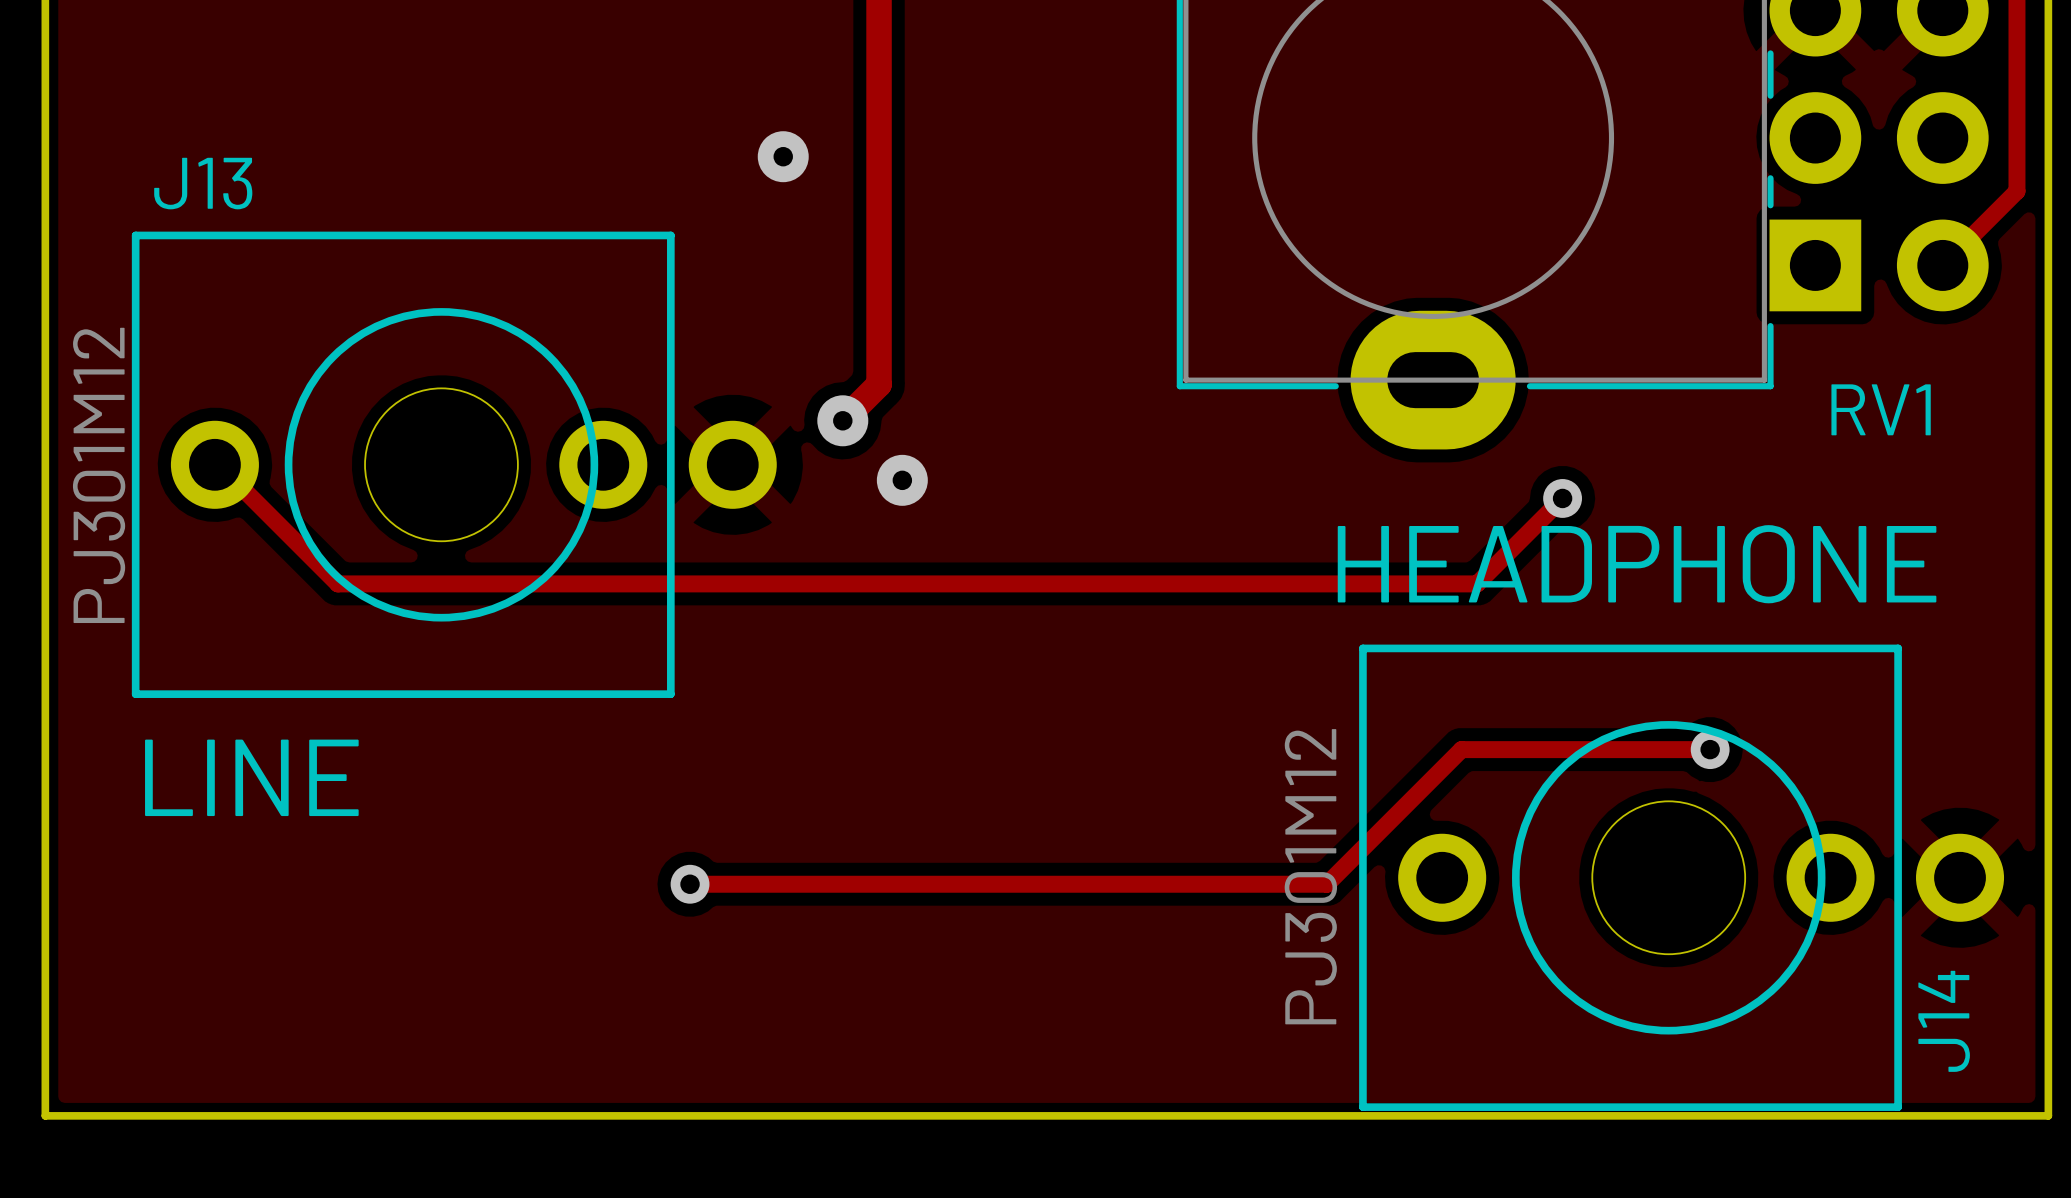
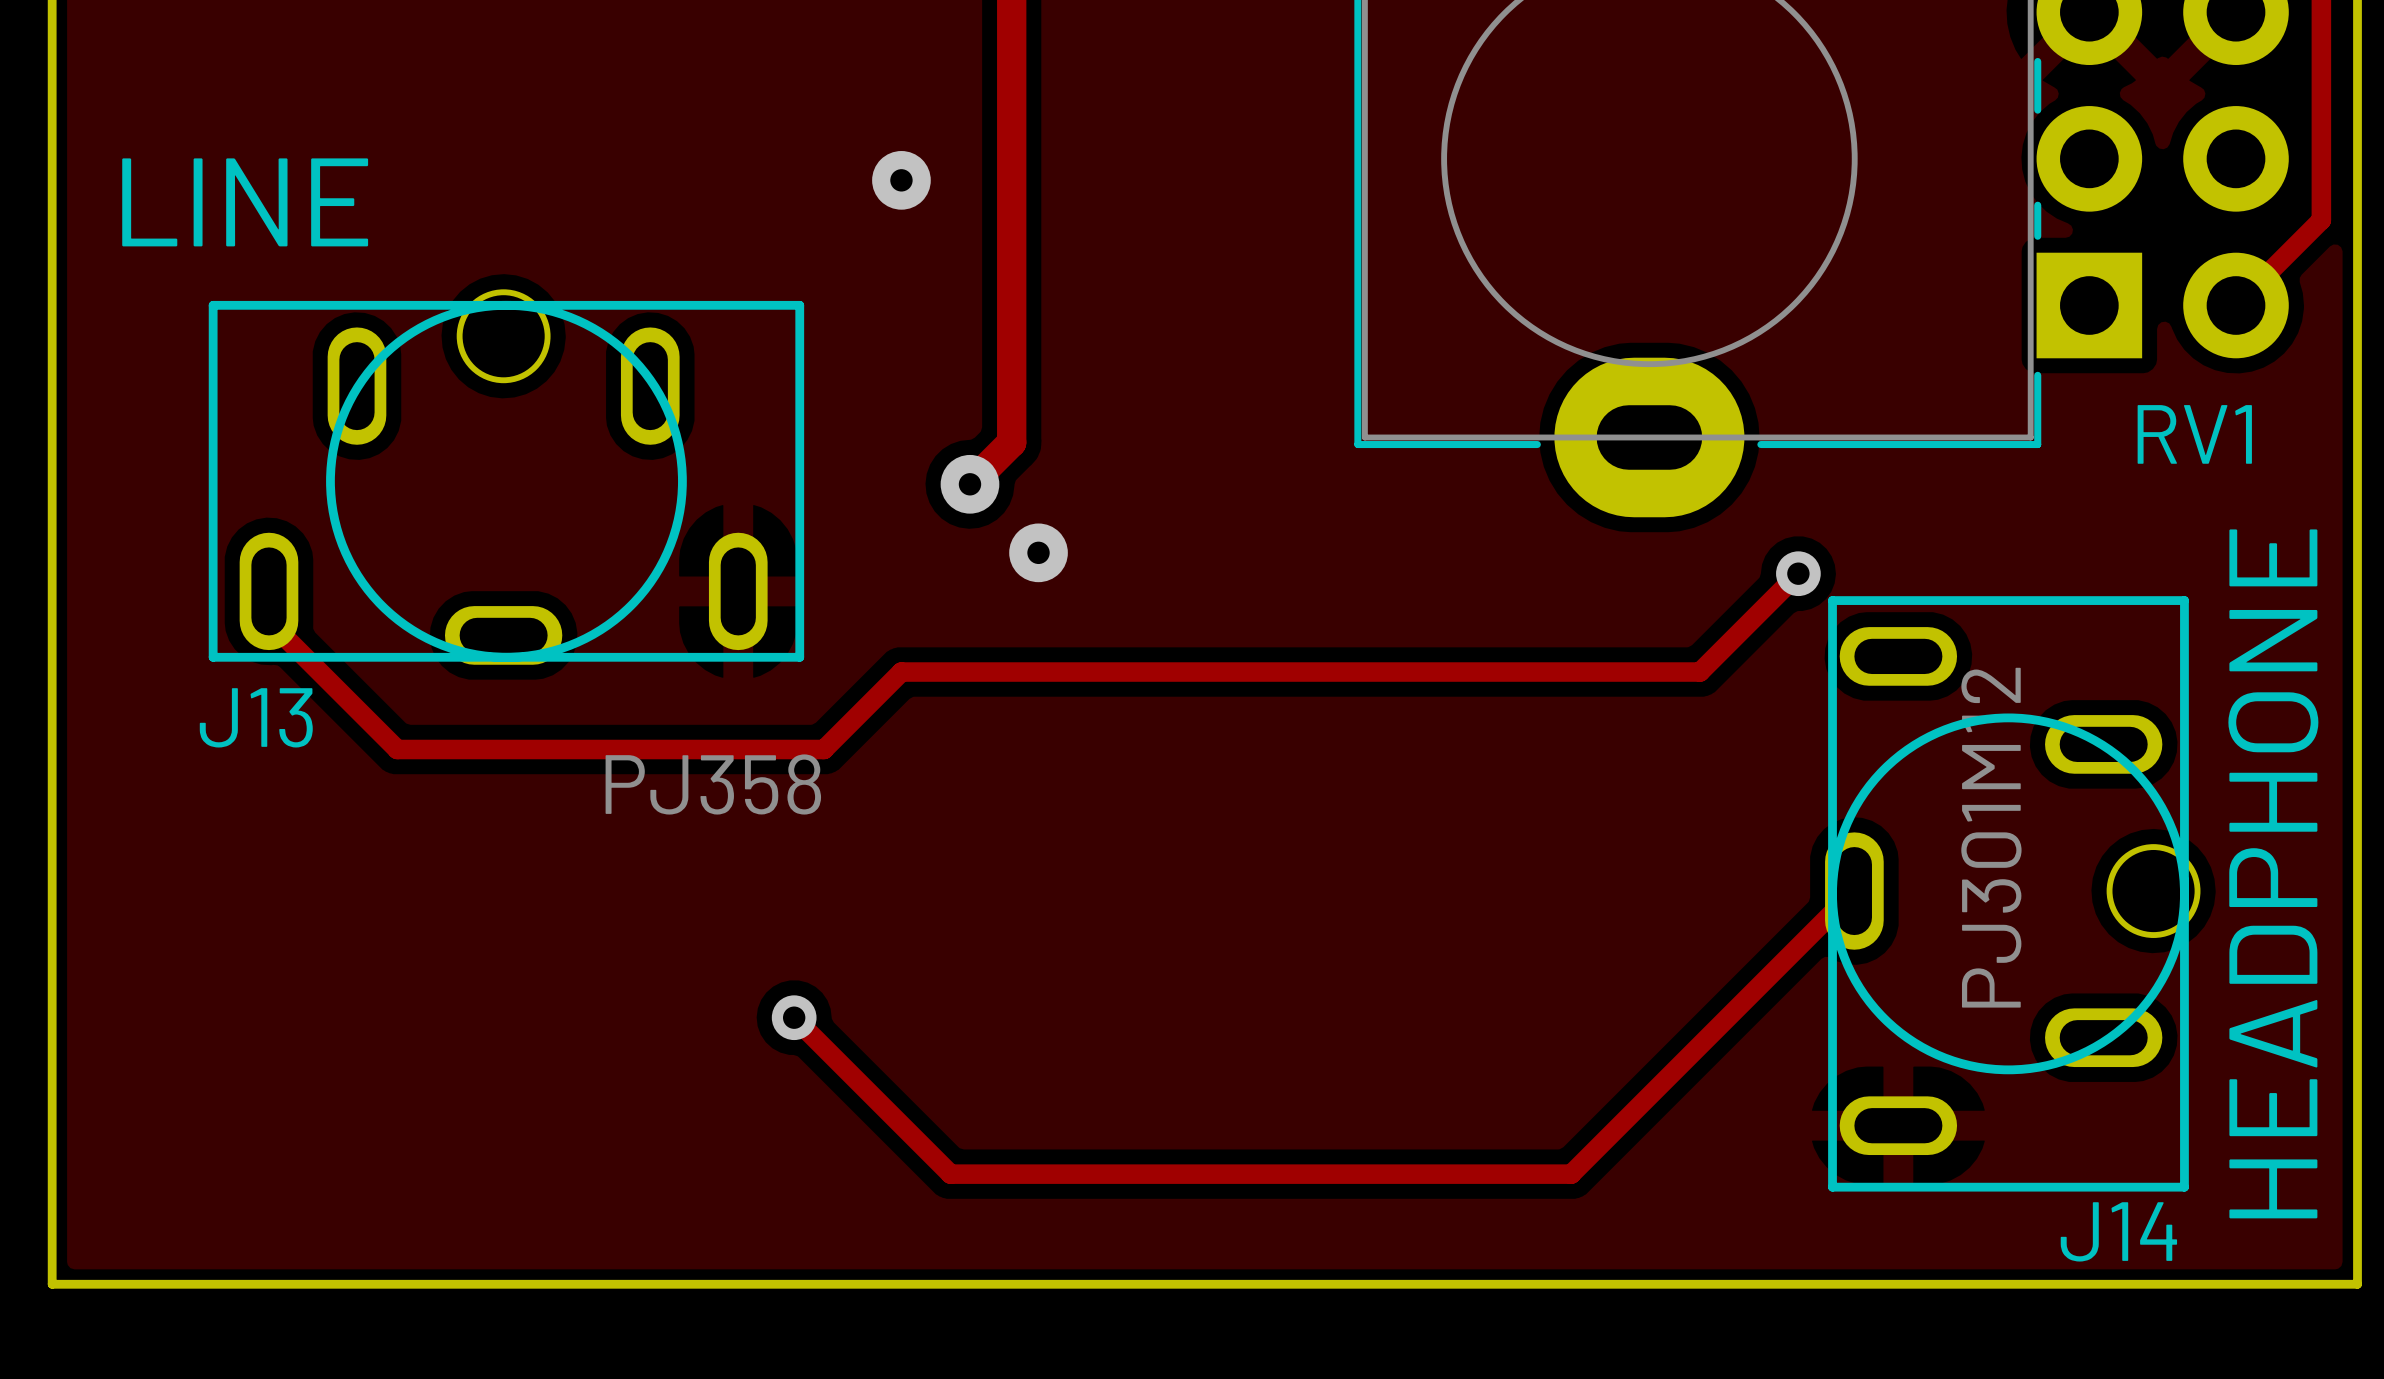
J13 name position: J13 (203, 183) -> J13 (256, 717)
J13 footprint: [131, 231, 777, 698] -> [208, 289, 805, 665]
RV1 name position: RV1 (1881, 409) -> RV1 (2194, 434)
track: (214, 464) (218, 464) (337, 583) (783, 583) -> (268, 591) (268, 621) (397, 749) (823, 749) (901, 672)
J13 value: PJ301M12 (99, 475) -> PJ358 (713, 784)
text rotation: 0° (1637, 564) -> 90° counterclockwise (2273, 873)
J14 footprint: [1359, 644, 2005, 1111] -> [1825, 596, 2201, 1192]
track: (1710, 749) (1461, 749) (1326, 884) (690, 884) -> (1854, 891) (1571, 1174) (950, 1174) (794, 1017)
via: (1710, 749) -> none
text position: LINE (251, 777) -> LINE (245, 202)
J14 value position: PJ301M12 (1310, 876) -> PJ301M12 (1991, 837)
J14 name position: J14 (1944, 1021) -> J14 (2118, 1231)

